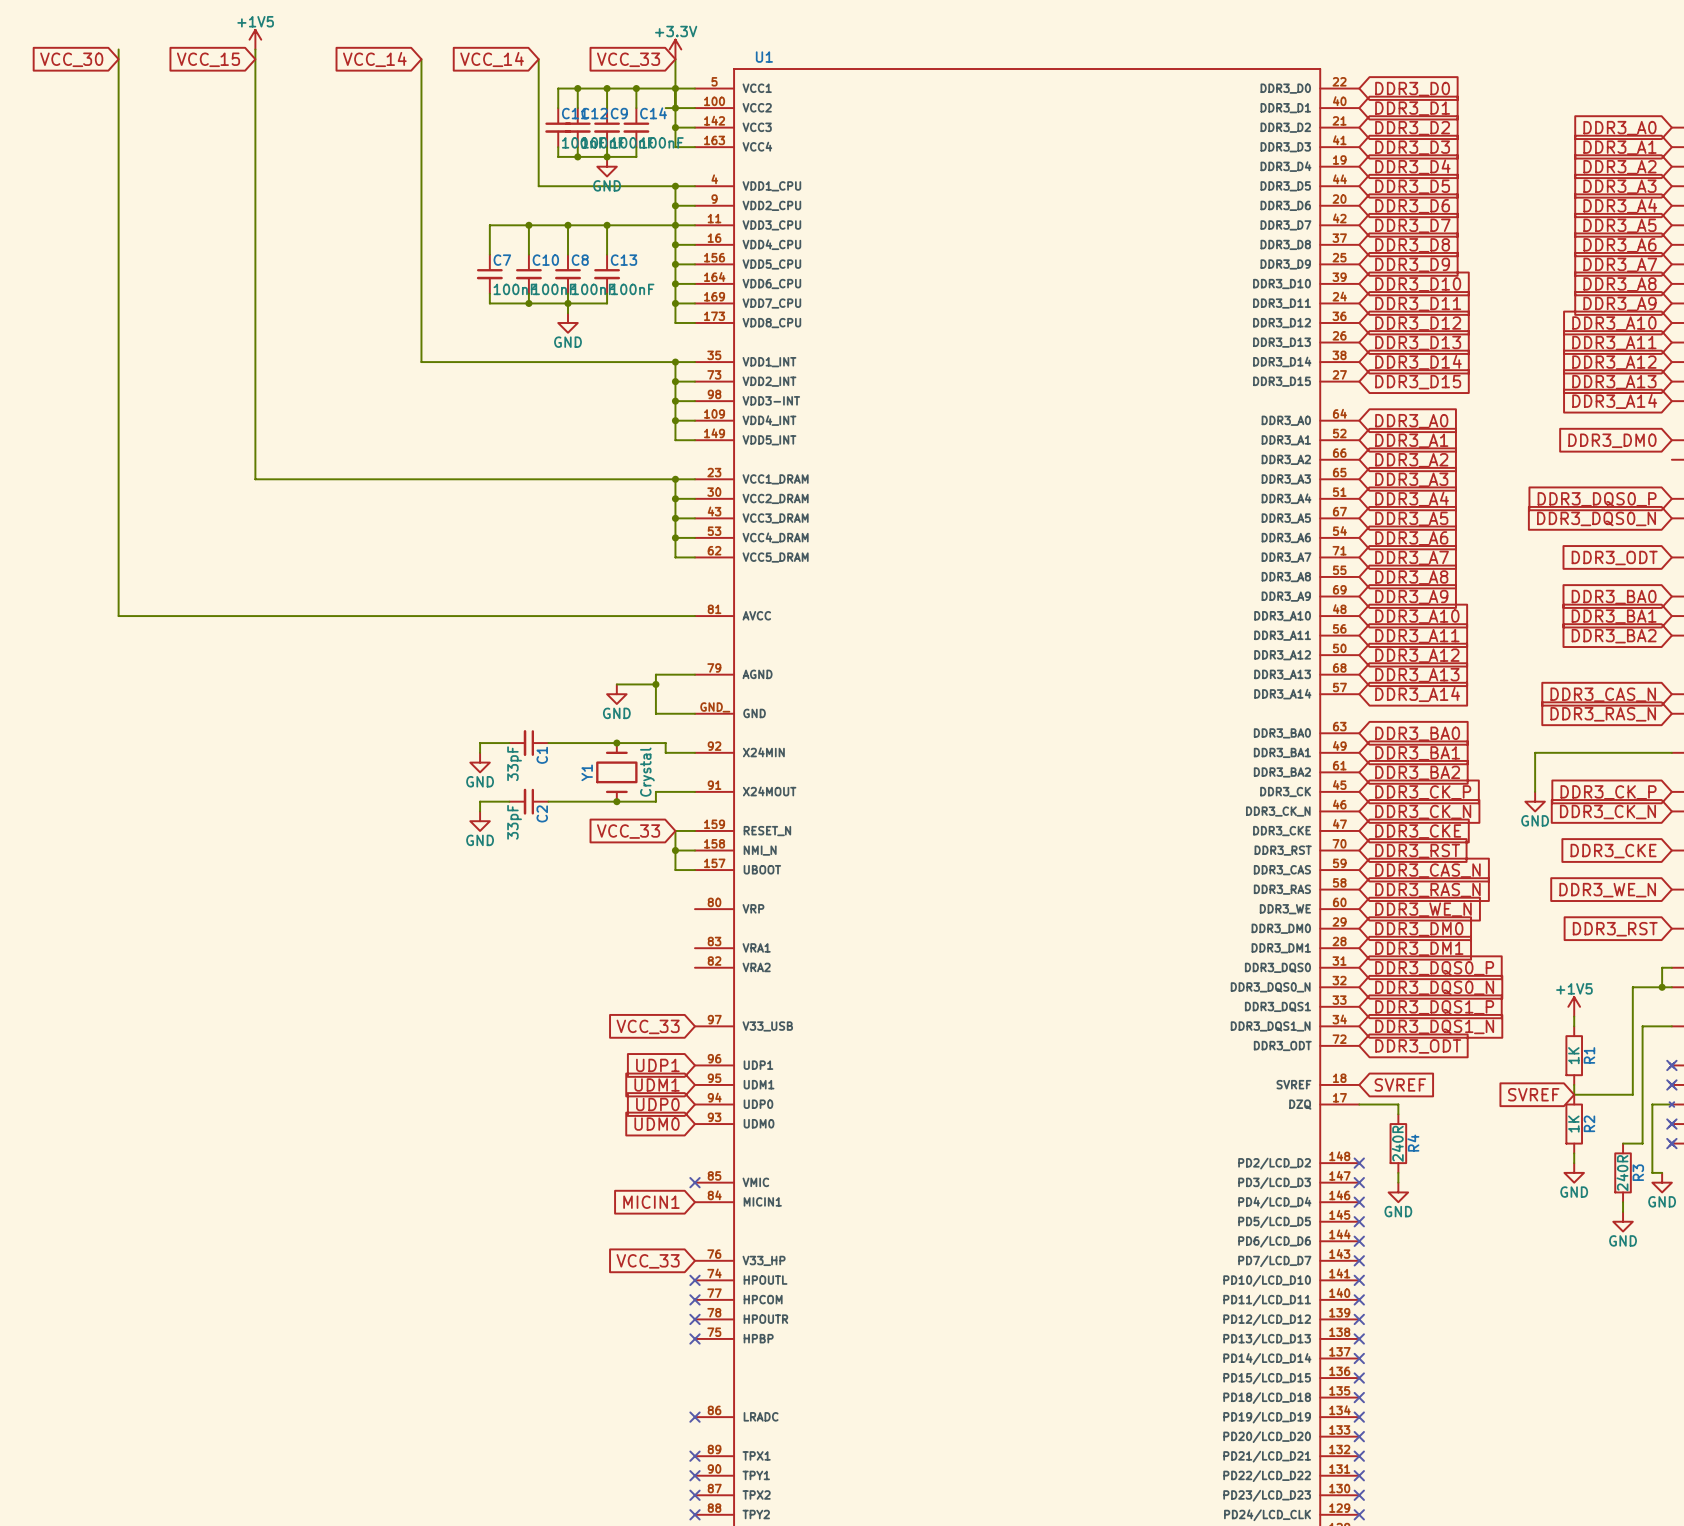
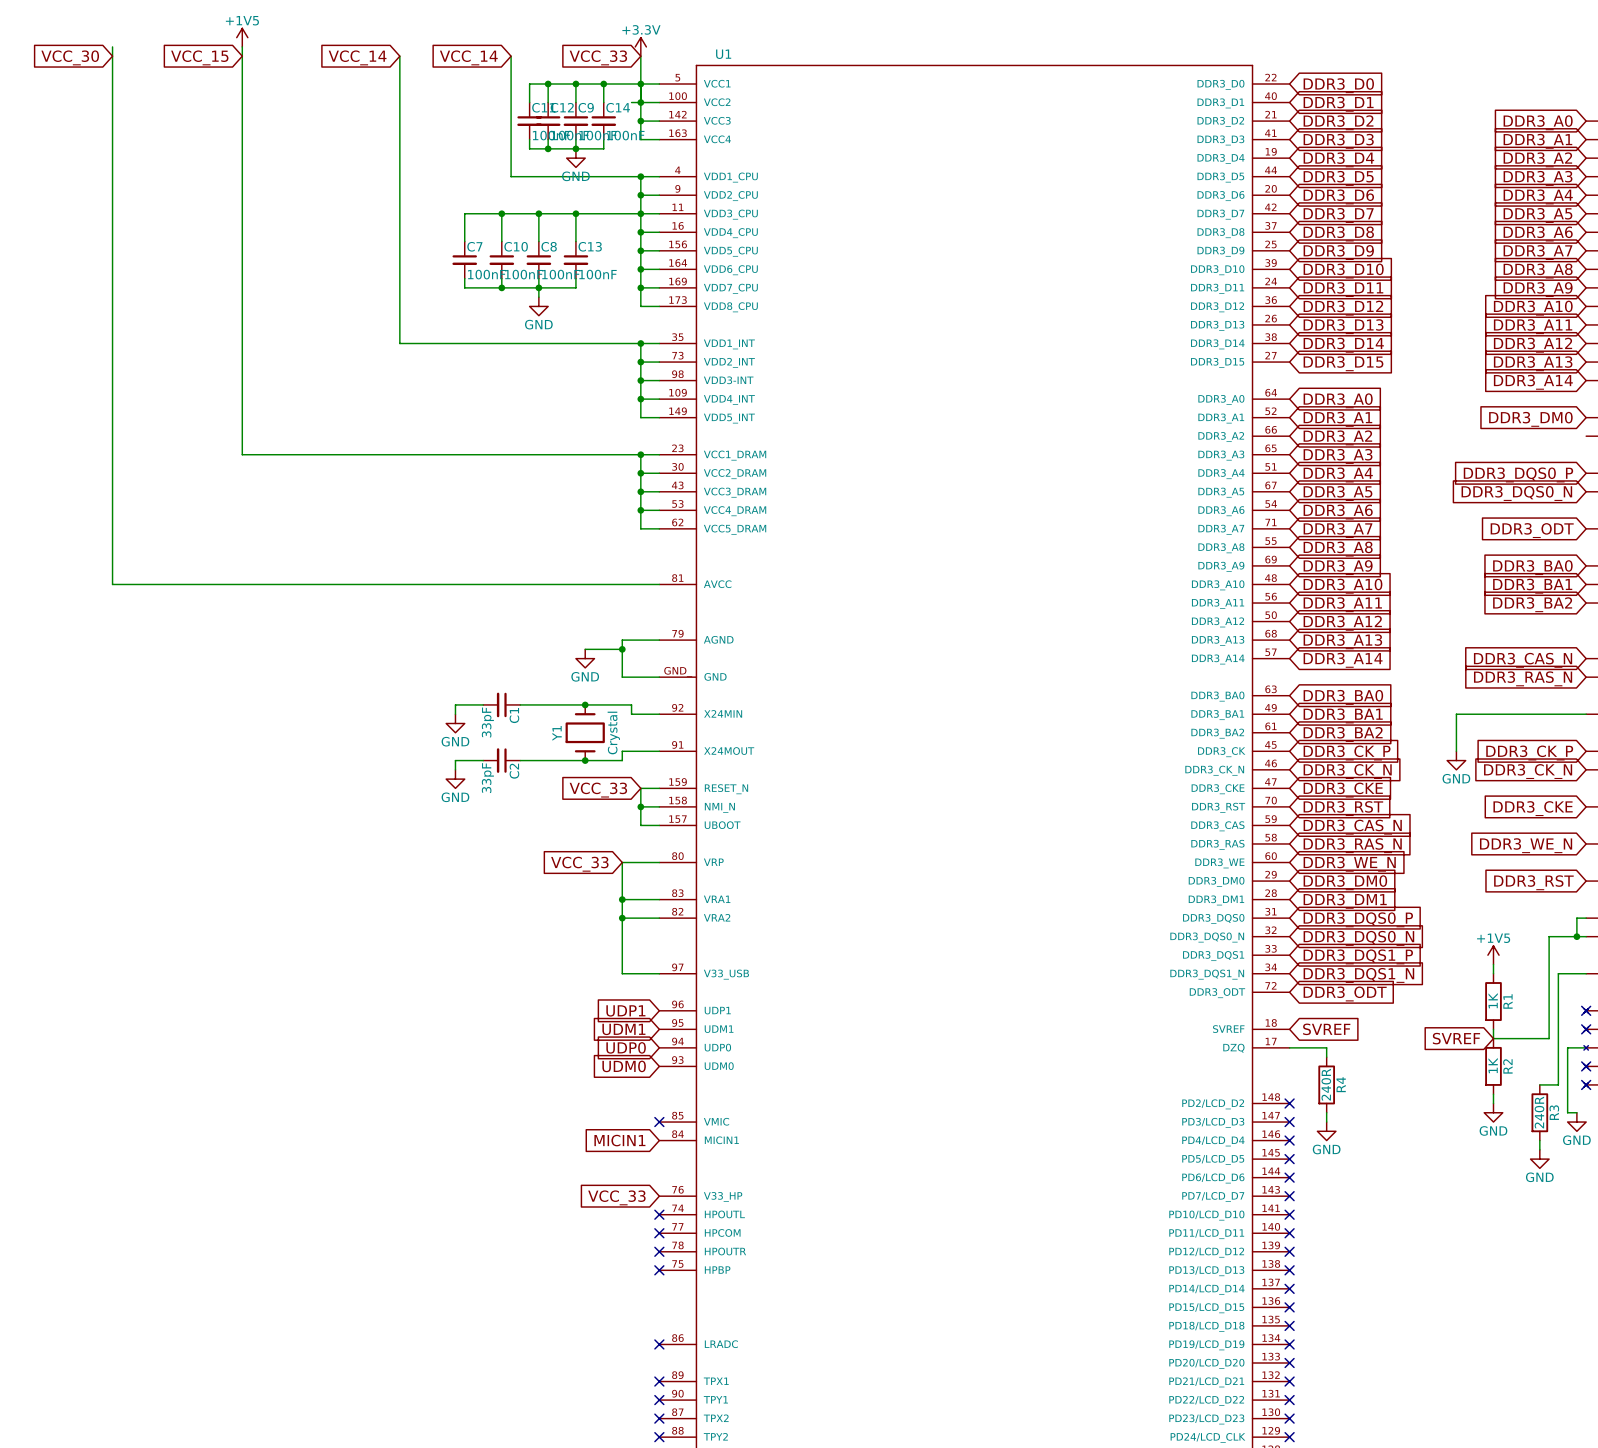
wire: none -> (659, 862) (622, 862) (622, 973) (659, 973)
wire: none -> (622, 899) (659, 899)
junction: none -> (622, 899)
wire: none -> (622, 918) (659, 918)
junction: none -> (622, 918)
global label position: VCC_33 (648, 1026) -> VCC_33 (579, 864)

